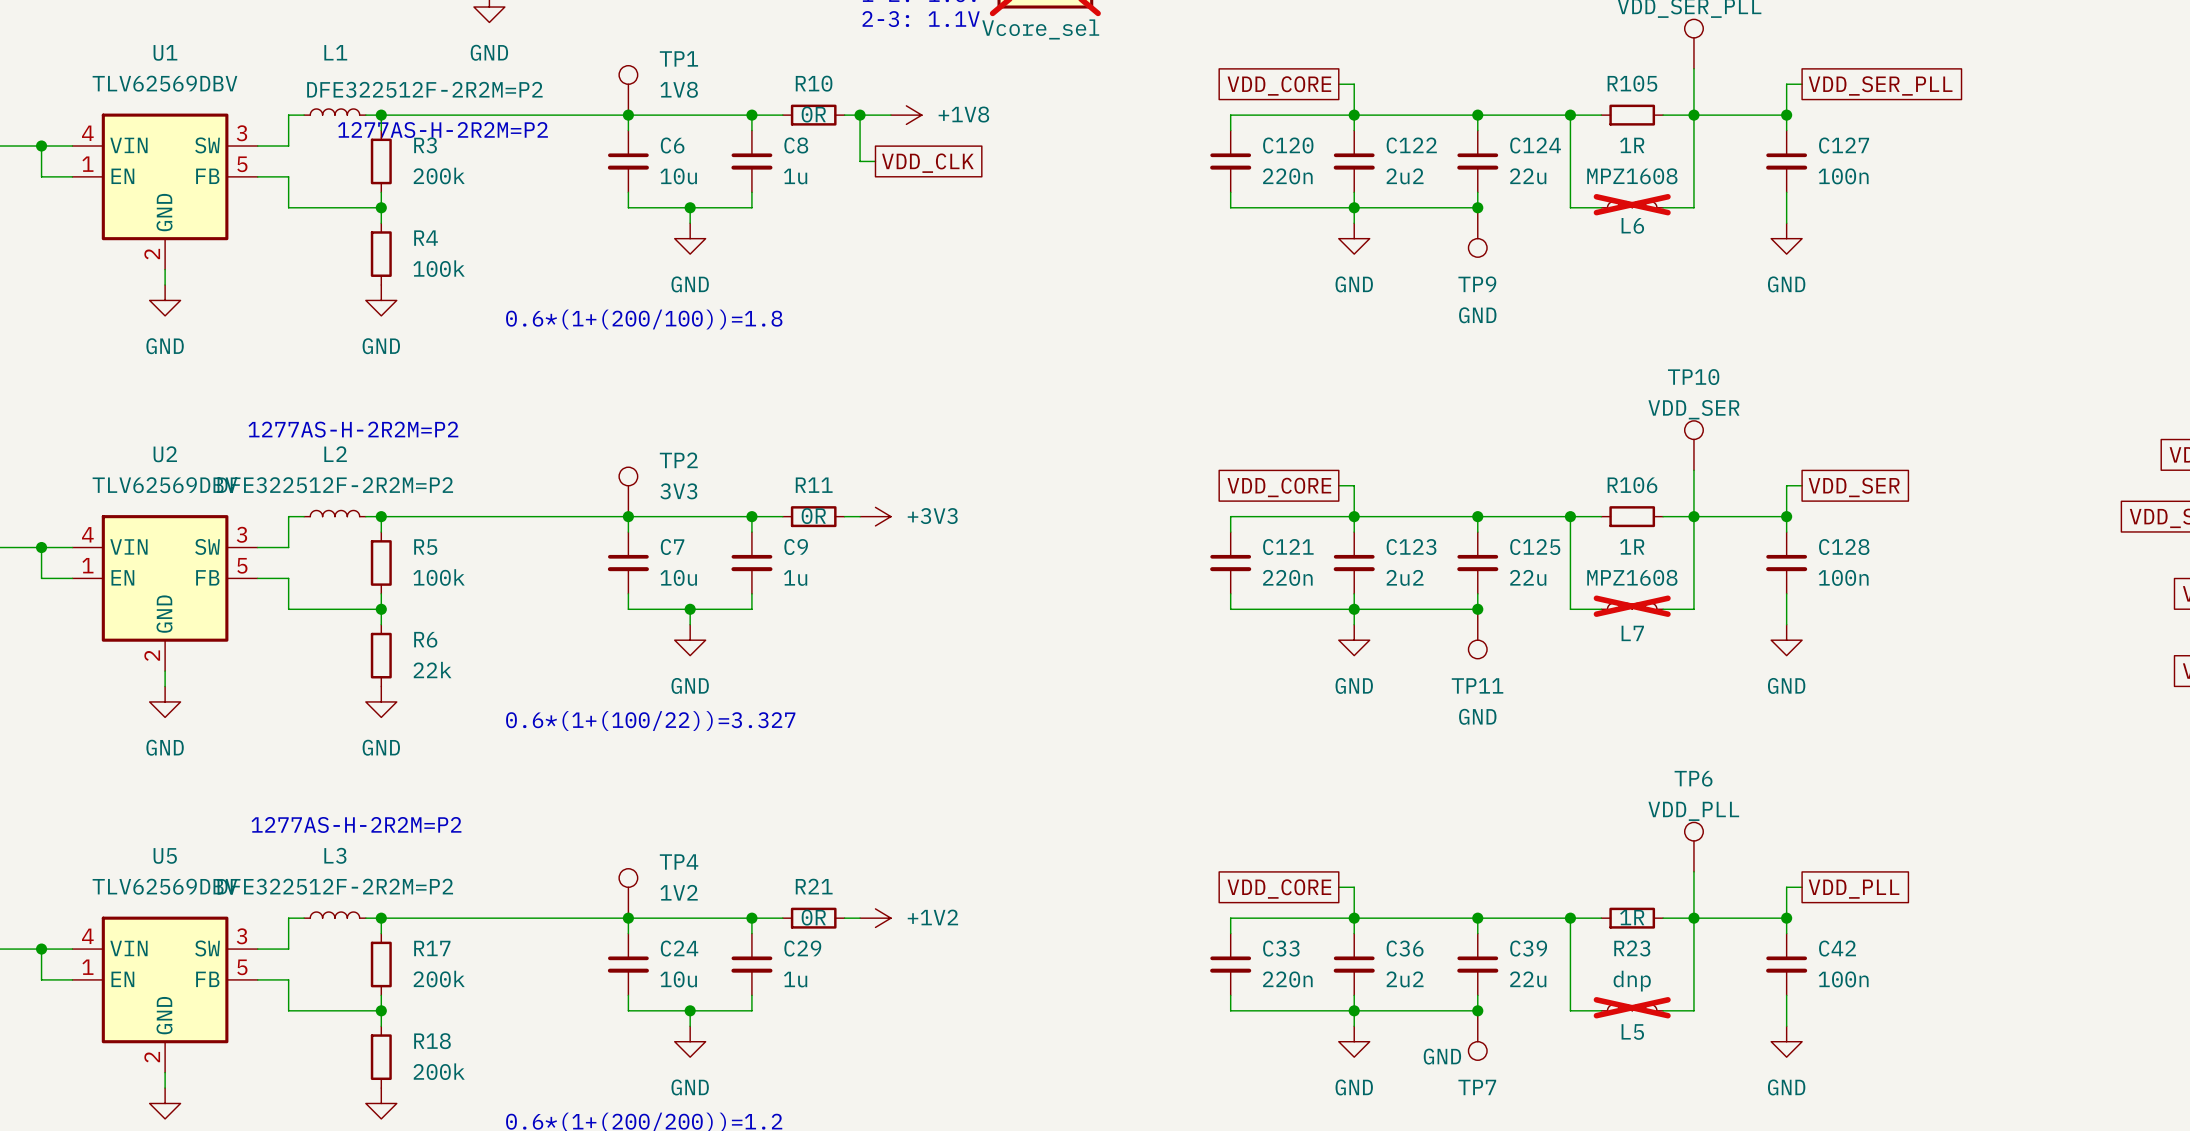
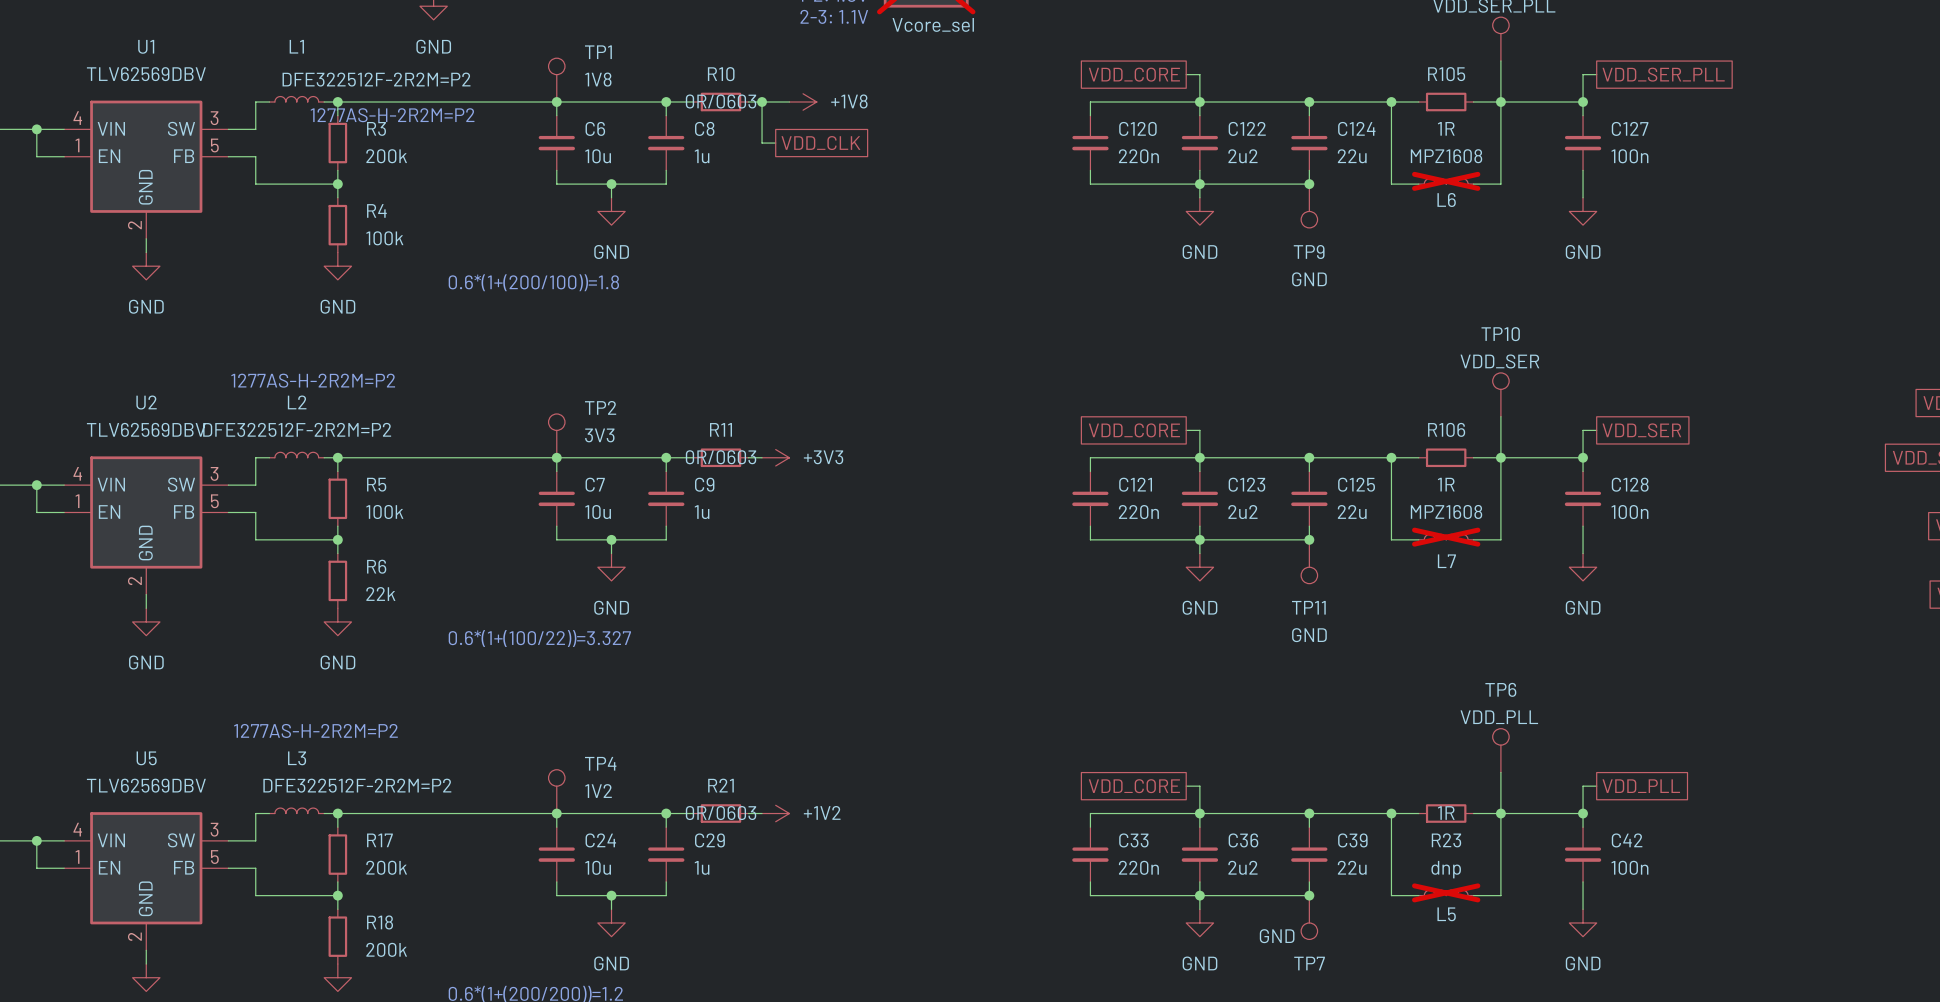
R10 value: 0R (813, 114) -> 0R/0603 (721, 101)
R11 value: 0R (813, 516) -> 0R/0603 (721, 457)
L3 value position: DFE322512F-2R2M=P2 (335, 886) -> DFE322512F-2R2M=P2 (357, 785)
R21 value: 0R (813, 917) -> 0R/0603 (721, 813)

